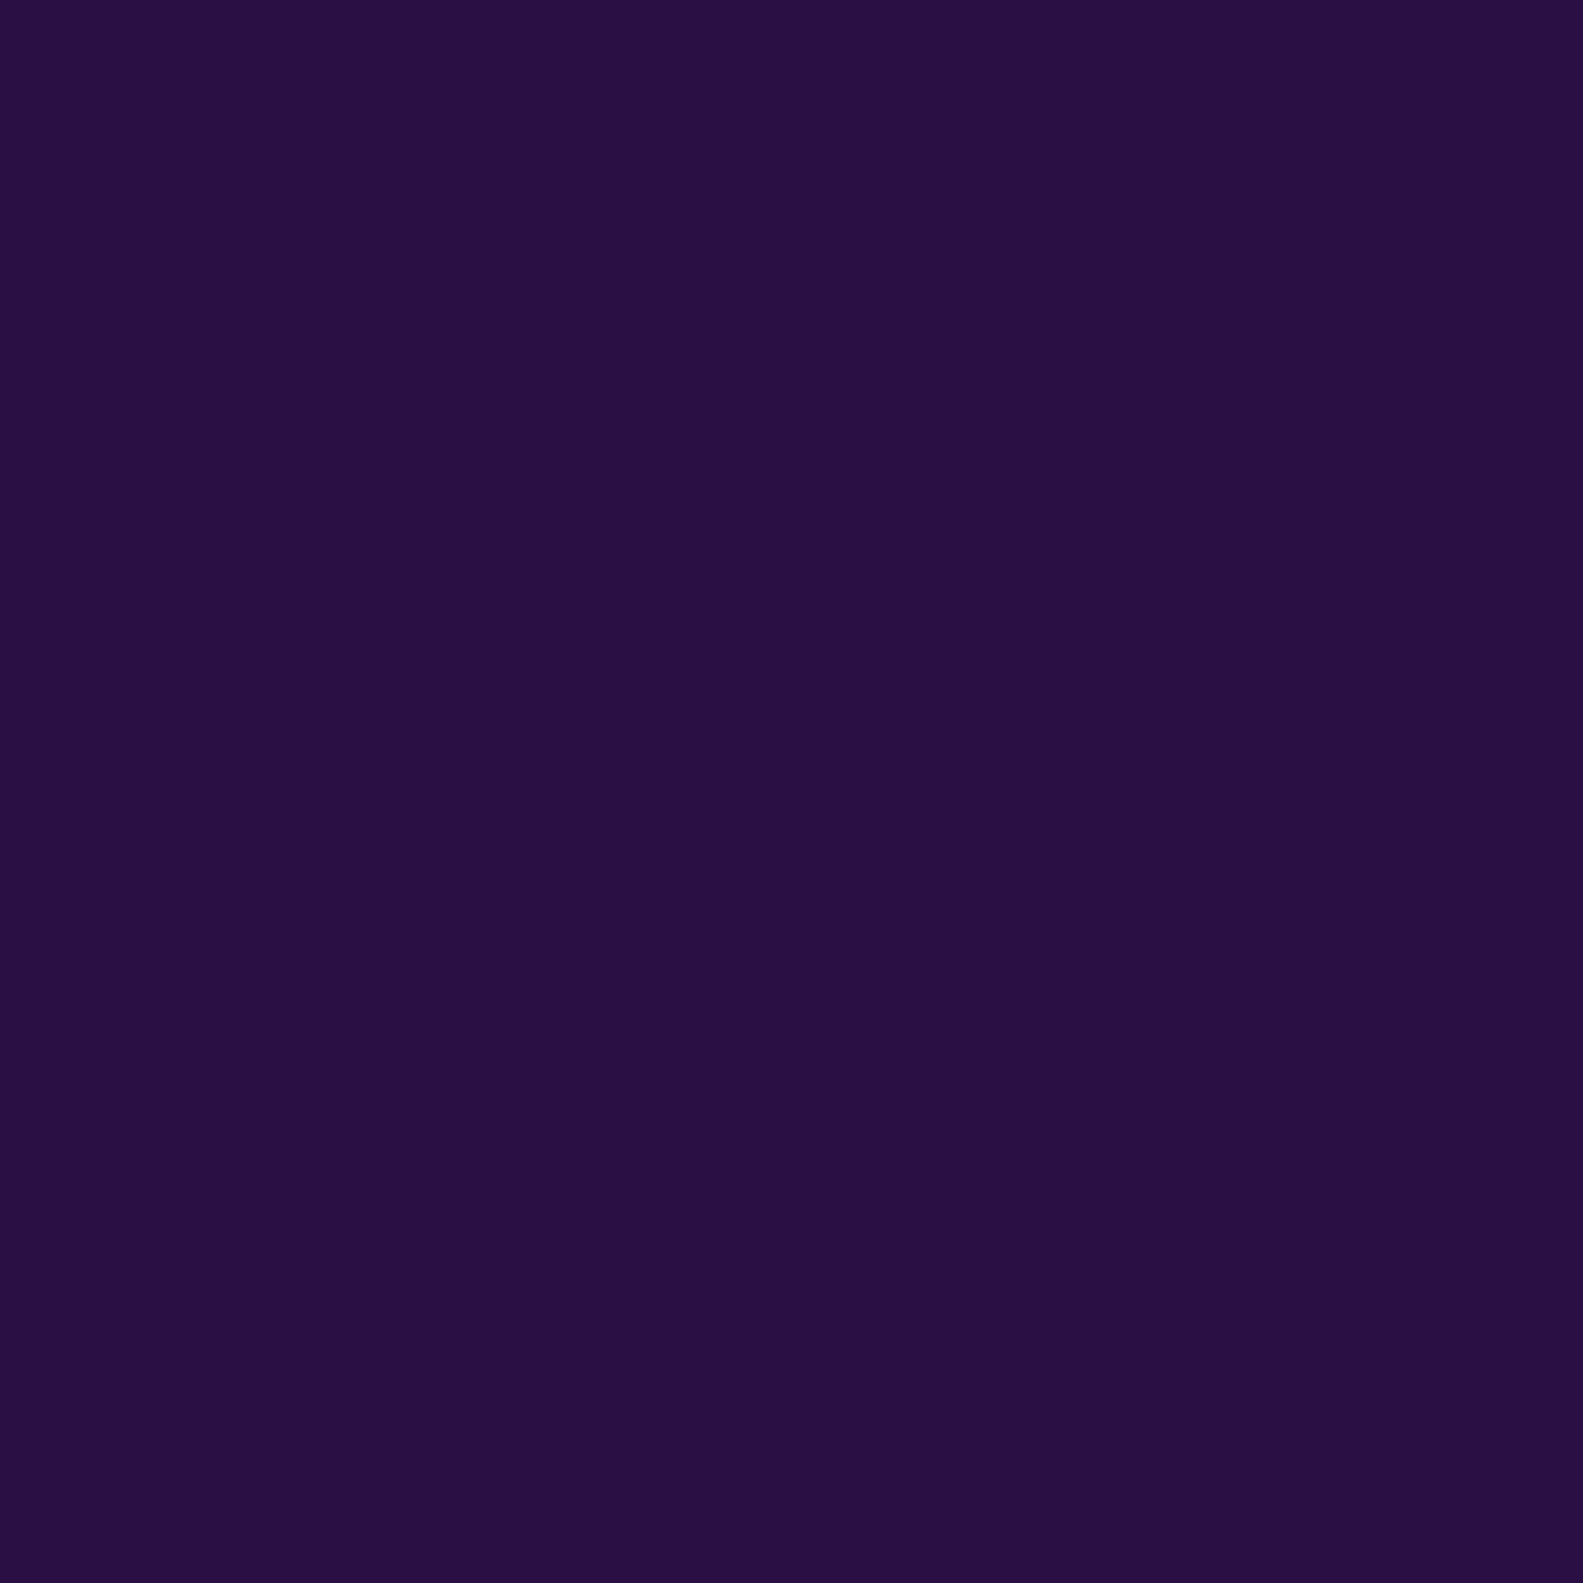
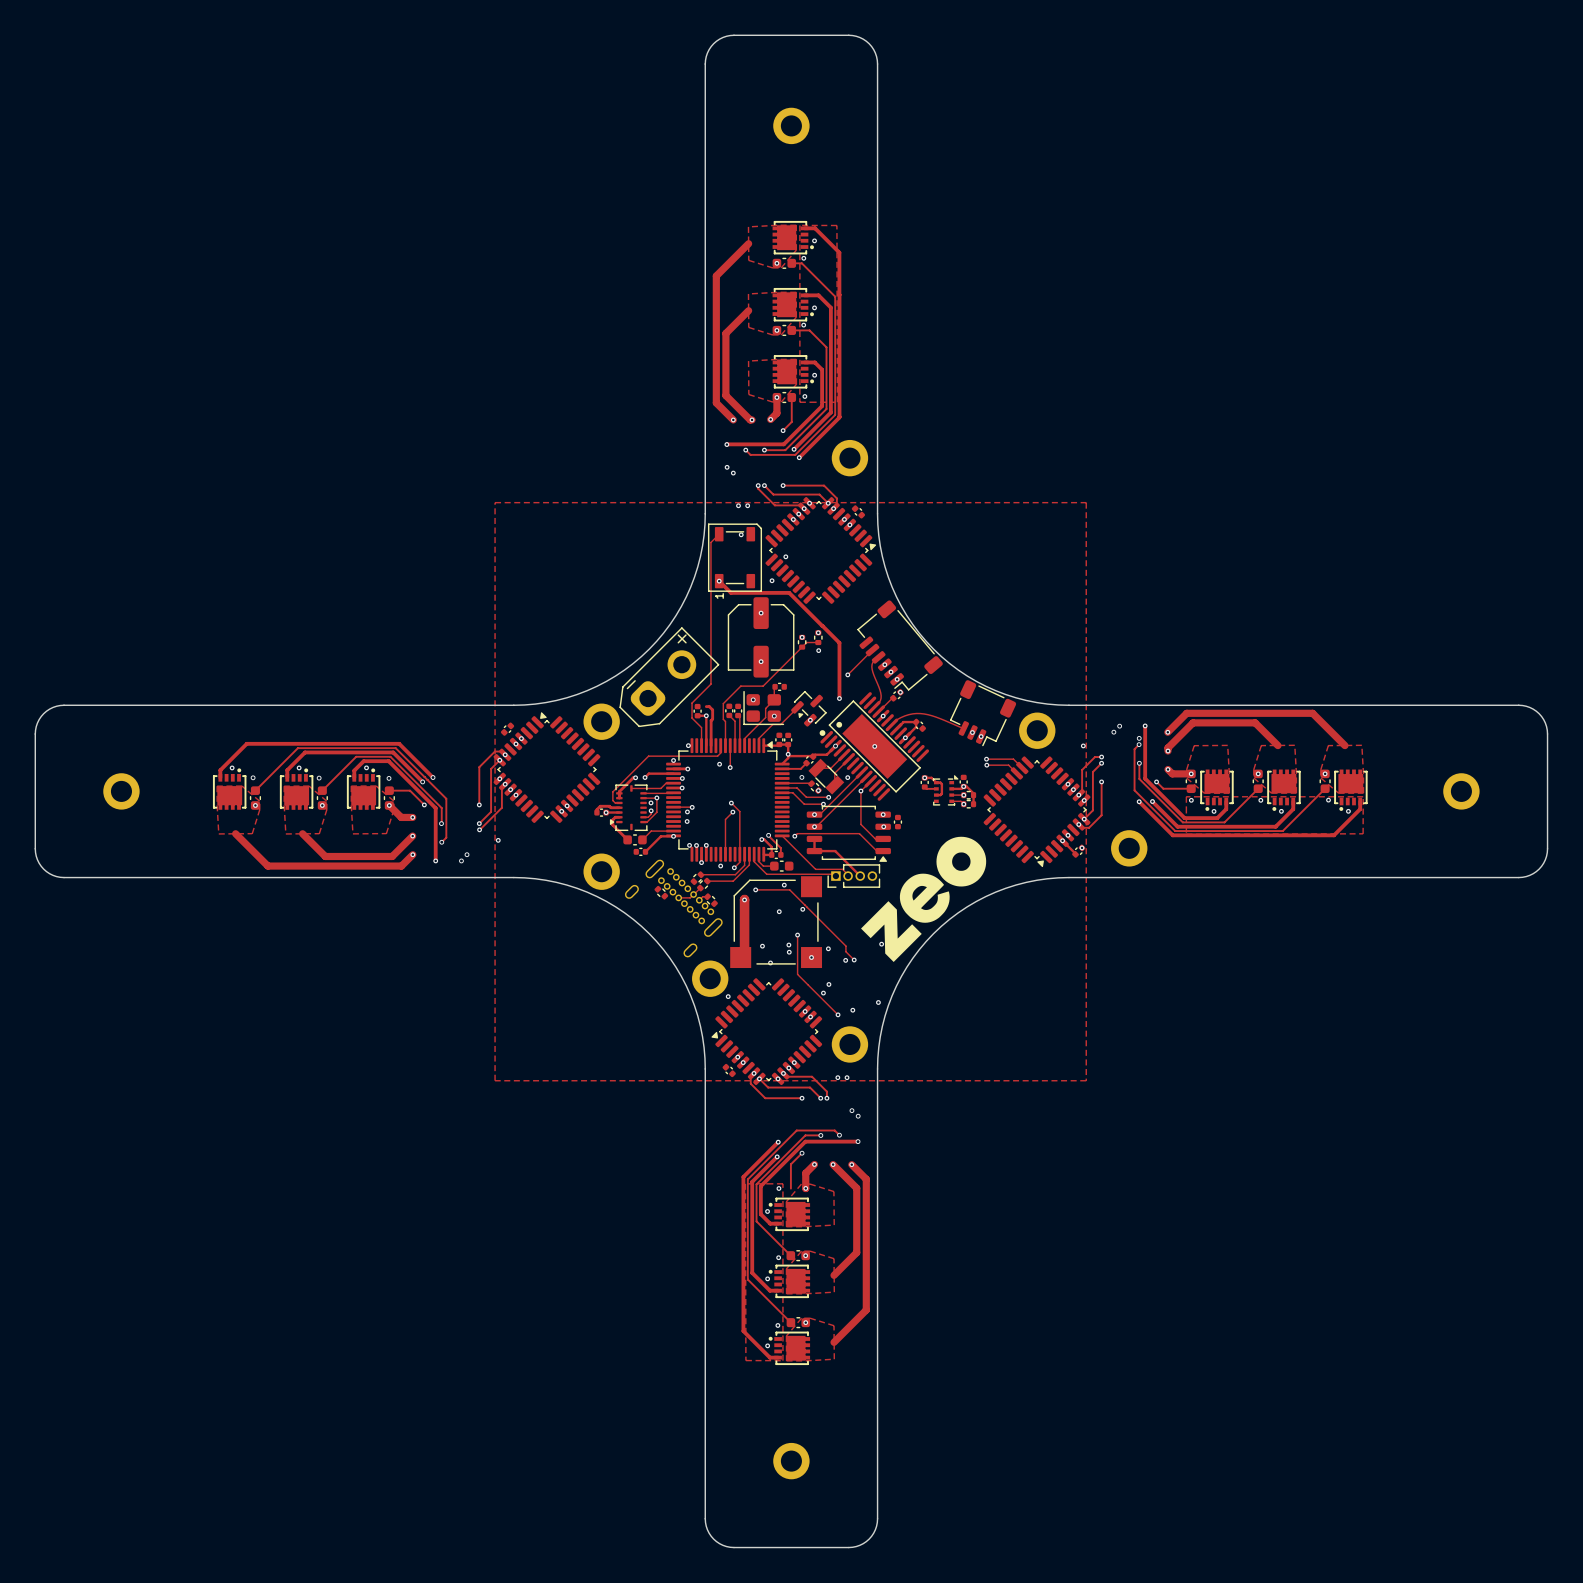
board edge: none -> (733, 35) (852, 35) (869, 43) (876, 56) (878, 535) (885, 566) (896, 596) (912, 624) (941, 656) (958, 669) (985, 686) (1015, 697) (1047, 704) (1518, 705) (1529, 707) (1539, 713) (1547, 730) (1547, 852) (1541, 866) (1529, 875) (1518, 877) (1047, 878) (1015, 885) (985, 896) (958, 912) (926, 941) (906, 967) (892, 995) (882, 1026) (878, 1047) (877, 1518) (871, 1536) (863, 1543) (852, 1547) (730, 1547) (716, 1541) (707, 1529) (705, 1518) (704, 1047) (697, 1015) (686, 985) (663, 949) (641, 926) (615, 906) (587, 892) (556, 882) (535, 878) (64, 877) (46, 871) (39, 863) (35, 852) (35, 730) (41, 716) (53, 707) (64, 705) (535, 704) (566, 697) (596, 686) (624, 669) (656, 641) (675, 615) (690, 587) (700, 556) (704, 535) (705, 64) (707, 53) (713, 43) (723, 37) (733, 35)
part: none -> (791, 125)
zone outline: none -> (777, 225) (796, 225) (796, 250) (781, 267) (772, 267) (748, 260) (748, 226) (777, 225)
zone outline: none -> (799, 225) (799, 402) (837, 402) (836, 225) (799, 225)
track: none -> (804, 228) (815, 228) (839, 252) (839, 294)
part: none -> (793, 237)
via: none -> (814, 240)
track: none -> (748, 243) (716, 276) (716, 402) (733, 419)
via: none -> (803, 258)
via: none -> (776, 263)
part: none -> (784, 263)
track: none -> (791, 263) (801, 263) (835, 296) (835, 414) (795, 454) (750, 454) (745, 450)
zone outline: none -> (777, 292) (796, 292) (796, 317) (781, 334) (772, 334) (748, 327) (748, 293) (777, 292)
track: none -> (839, 294) (839, 416)
track: none -> (804, 295) (818, 295) (830, 307) (830, 412) (794, 449)
part: none -> (793, 304)
via: none -> (814, 307)
track: none -> (748, 310) (725, 333) (725, 395) (752, 419)
via: none -> (803, 325)
via: none -> (776, 330)
part: none -> (784, 330)
track: none -> (791, 330) (809, 330) (826, 347) (826, 409) (785, 450) (764, 450)
zone outline: none -> (777, 359) (796, 359) (796, 384) (781, 402) (772, 402) (748, 394) (748, 361) (777, 359)
track: none -> (804, 362) (814, 362) (822, 369) (822, 406) (783, 444) (726, 444)
part: none -> (793, 371)
via: none -> (814, 375)
via: none -> (804, 396)
track: none -> (776, 397) (776, 413) (770, 419)
via: none -> (776, 397)
part: none -> (784, 397)
track: none -> (791, 397) (791, 421) (783, 430)
track: none -> (839, 416) (799, 457)
via: none -> (733, 419)
via: none -> (752, 419)
via: none -> (770, 419)
via: none -> (783, 430)
via: none -> (726, 444)
via: none -> (794, 449)
via: none -> (745, 450)
via: none -> (764, 450)
via: none -> (799, 457)
part: none -> (849, 458)
via: none -> (727, 467)
via: none -> (733, 473)
track: none -> (758, 485) (758, 488) (774, 505) (800, 505) (804, 508)
via: none -> (758, 485)
track: none -> (764, 485) (773, 494) (819, 494) (828, 503)
via: none -> (764, 485)
track: none -> (783, 485) (824, 485) (836, 498) (836, 505) (833, 508)
via: none -> (783, 485)
zone outline: none -> (495, 502) (1086, 502) (1086, 1080) (495, 1080) (495, 502)
via: none -> (809, 503)
via: none -> (828, 503)
via: none -> (738, 505)
via: none -> (747, 505)
via: none -> (804, 508)
via: none -> (833, 508)
part: none -> (858, 511)
via: none -> (798, 514)
via: none -> (793, 519)
via: none -> (844, 519)
via: none -> (849, 524)
track: none -> (719, 534) (710, 542) (710, 684) (692, 703) (692, 718) (701, 727) (701, 745)
via: none -> (741, 534)
part: none -> (820, 550)
via: none -> (785, 556)
part: none -> (735, 557)
via: none -> (772, 580)
track: none -> (719, 581) (730, 592) (789, 592) (839, 642) (839, 698)
via: none -> (719, 581)
via: none -> (761, 613)
via: none -> (818, 632)
part: none -> (761, 637)
via: none -> (802, 637)
part: none -> (818, 637)
part: none -> (802, 642)
track: none -> (818, 642) (806, 642) (763, 686) (740, 686) (723, 703) (725, 745)
part: none -> (900, 645)
via: none -> (818, 650)
track: none -> (872, 650) (847, 674)
track: none -> (874, 660) (871, 666) (880, 692) (879, 702)
via: none -> (761, 661)
via: none -> (884, 664)
via: none -> (890, 672)
via: none -> (847, 674)
part: none -> (669, 677)
via: none -> (897, 679)
track: none -> (775, 686) (774, 699) (765, 708) (765, 717) (744, 738) (744, 745)
part: none -> (779, 686)
via: none -> (900, 692)
part: none -> (896, 695)
via: none -> (839, 698)
track: none -> (893, 698) (878, 711)
via: none -> (753, 699)
track: none -> (706, 706) (712, 709) (711, 745)
track: none -> (797, 707) (780, 724) (772, 724) (758, 738) (758, 745)
part: none -> (763, 708)
part: none -> (808, 708)
part: none -> (729, 710)
part: none -> (738, 710)
part: none -> (697, 711)
part: none -> (983, 713)
track: none -> (697, 715) (706, 715) (706, 745)
via: none -> (706, 715)
track: none -> (729, 715) (735, 721) (735, 745)
track: none -> (738, 715) (739, 717) (739, 745)
via: none -> (774, 716)
via: none -> (883, 716)
track: none -> (896, 719) (908, 714) (924, 713) (963, 728)
via: none -> (810, 720)
part: none -> (601, 721)
part: none -> (919, 725)
track: none -> (1145, 725) (1145, 778) (1184, 818) (1217, 818) (1226, 809) (1226, 801)
via: none -> (1145, 725)
via: none -> (1119, 726)
part: none -> (507, 729)
track: none -> (896, 729) (903, 722) (916, 722) (916, 727) (905, 738)
part: none -> (1037, 730)
via: none -> (972, 732)
via: none -> (1113, 732)
track: none -> (1167, 732) (1186, 713) (1312, 713) (1344, 745)
via: none -> (1167, 732)
via: none -> (981, 736)
via: none -> (905, 737)
via: none -> (521, 738)
via: none -> (1139, 738)
part: none -> (779, 739)
part: none -> (788, 739)
via: none -> (516, 743)
track: none -> (779, 744) (763, 745)
track: none -> (779, 744) (788, 744) (788, 758) (782, 764)
track: none -> (1139, 744) (1134, 749) (1134, 790) (1175, 831) (1282, 831) (1325, 788)
via: none -> (1139, 744)
via: none -> (688, 745)
track: none -> (720, 745) (720, 753) (717, 756) (648, 756) (612, 791) (612, 800) (619, 802)
track: none -> (730, 745) (730, 767)
via: none -> (1083, 745)
zone outline: none -> (1227, 745) (1229, 793) (1204, 793) (1186, 778) (1186, 769) (1194, 745) (1227, 745)
track: none -> (1277, 745) (1255, 722) (1193, 722) (1167, 747) (1167, 751)
zone outline: none -> (1294, 745) (1296, 793) (1271, 793) (1253, 778) (1253, 769) (1261, 745) (1294, 745)
zone outline: none -> (1361, 745) (1363, 793) (1338, 793) (1320, 778) (1320, 769) (1328, 745) (1361, 745)
track: none -> (835, 746) (826, 754) (814, 754) (813, 756) (789, 756) (788, 754)
via: none -> (835, 746)
part: none -> (874, 746)
via: none -> (874, 746)
via: none -> (1167, 751)
track: none -> (505, 754) (501, 751) (494, 751) (479, 767) (479, 804)
via: none -> (505, 754)
via: none -> (788, 754)
track: none -> (844, 754) (831, 768) (817, 768)
track: none -> (1101, 757) (1095, 757) (1082, 769) (1082, 791) (1078, 795)
via: none -> (1101, 757)
part: none -> (809, 759)
track: none -> (848, 759) (834, 773) (834, 785)
track: none -> (986, 759) (1013, 759) (1022, 768)
via: none -> (986, 759)
track: none -> (499, 760) (491, 768) (491, 811) (479, 823)
via: none -> (499, 760)
via: none -> (673, 760)
track: none -> (806, 763) (800, 768) (782, 768)
track: none -> (1101, 763) (1092, 771) (1092, 810) (1084, 819)
via: none -> (1101, 763)
track: none -> (1139, 763) (1139, 778) (1182, 822) (1224, 822) (1258, 788)
via: none -> (1139, 763)
via: none -> (719, 764)
track: none -> (986, 765) (1008, 765) (1016, 773)
via: none -> (986, 765)
via: none -> (232, 767)
via: none -> (299, 767)
via: none -> (366, 767)
part: none -> (546, 767)
via: none -> (730, 767)
track: none -> (673, 768) (687, 769)
via: none -> (687, 769)
track: none -> (1167, 769) (1172, 773) (1191, 773)
via: none -> (1167, 769)
track: none -> (861, 772) (819, 814) (814, 814)
track: none -> (673, 773) (648, 773) (644, 777)
via: none -> (1191, 773)
via: none -> (1258, 773)
via: none -> (1325, 773)
part: none -> (826, 776)
track: none -> (866, 776) (814, 826)
via: none -> (253, 777)
track: none -> (287, 777) (287, 770) (305, 752) (393, 752) (422, 781)
track: none -> (354, 777) (354, 770) (363, 761) (388, 761) (435, 808) (435, 860)
track: none -> (432, 777) (399, 743) (246, 743) (220, 770) (220, 777)
via: none -> (433, 777)
track: none -> (635, 777) (619, 791) (619, 798)
via: none -> (635, 777)
via: none -> (645, 777)
via: none -> (801, 777)
via: none -> (847, 777)
track: none -> (924, 777) (931, 777) (936, 782) (941, 784) (941, 793) (936, 795)
via: none -> (924, 777)
via: none -> (319, 778)
via: none -> (389, 778)
via: none -> (499, 778)
via: none -> (682, 778)
via: none -> (422, 781)
track: none -> (870, 781) (860, 791) (860, 824) (875, 838) (883, 838)
part: none -> (963, 781)
track: none -> (1101, 781) (1101, 815) (1089, 827) (1082, 827) (1078, 824)
via: none -> (1101, 781)
track: none -> (1156, 781) (1163, 788) (1191, 788)
via: none -> (1156, 781)
part: none -> (1191, 781)
part: none -> (1258, 781)
part: none -> (1325, 781)
part: none -> (924, 782)
track: none -> (673, 783) (666, 783) (660, 788) (631, 788)
track: none -> (782, 783) (811, 783)
track: none -> (505, 784) (501, 787) (501, 807) (479, 829)
via: none -> (505, 784)
via: none -> (1068, 784)
zone outline: none -> (242, 786) (259, 801) (259, 809) (252, 833) (218, 833) (217, 786) (242, 786)
zone outline: none -> (309, 786) (326, 801) (326, 809) (319, 833) (285, 833) (284, 786) (309, 786)
zone outline: none -> (376, 786) (393, 801) (393, 809) (386, 833) (352, 833) (351, 786) (376, 786)
via: none -> (963, 786)
part: none -> (814, 787)
track: none -> (924, 787) (926, 788) (936, 788)
via: none -> (682, 788)
track: none -> (782, 788) (797, 788) (806, 797) (828, 797)
track: none -> (951, 788) (966, 786) (973, 793) (973, 804)
part: none -> (229, 789)
part: none -> (296, 789)
part: none -> (363, 789)
via: none -> (510, 789)
via: none -> (1073, 789)
track: none -> (255, 790) (297, 748) (395, 748) (446, 798) (446, 837) (441, 842)
track: none -> (322, 790) (356, 756) (390, 756) (441, 808) (441, 823)
track: none -> (389, 790) (410, 790) (424, 804)
via: none -> (818, 790)
part: none -> (945, 790)
part: none -> (1216, 790)
part: none -> (1283, 790)
part: none -> (1350, 790)
part: none -> (121, 791)
via: none -> (860, 791)
part: none -> (1461, 791)
track: none -> (673, 792) (643, 793)
track: none -> (782, 792) (792, 792) (804, 804) (823, 804)
via: none -> (516, 795)
track: none -> (951, 795) (963, 795)
via: none -> (963, 795)
part: none -> (968, 795)
via: none -> (1078, 795)
zone outline: none -> (1186, 796) (1363, 796) (1363, 833) (1186, 834) (1186, 796)
via: none -> (656, 797)
via: none -> (828, 797)
part: none -> (255, 798)
part: none -> (322, 798)
part: none -> (389, 798)
track: none -> (643, 798) (656, 797) (656, 812) (647, 822) (643, 822)
part: none -> (727, 799)
via: none -> (1084, 800)
via: none -> (1191, 800)
via: none -> (1260, 800)
via: none -> (1328, 800)
track: none -> (951, 801) (960, 801) (963, 804)
via: none -> (1139, 801)
via: none -> (1152, 801)
track: none -> (1293, 801) (1293, 809) (1275, 826) (1177, 826) (1152, 801)
track: none -> (1360, 801) (1360, 809) (1334, 835) (1172, 835) (1139, 801)
via: none -> (651, 802)
track: none -> (731, 803) (739, 811) (739, 862) (734, 867)
via: none -> (731, 803)
via: none -> (424, 804)
via: none -> (479, 804)
via: none -> (823, 804)
via: none -> (963, 804)
part: none -> (968, 804)
via: none -> (255, 805)
via: none -> (322, 805)
track: none -> (389, 805) (401, 817) (412, 817)
via: none -> (389, 805)
via: none -> (567, 805)
track: none -> (619, 807) (600, 806) (596, 812)
part: none -> (628, 807)
track: none -> (673, 807) (692, 807)
via: none -> (692, 807)
track: none -> (651, 810) (648, 817) (643, 817)
via: none -> (651, 810)
via: none -> (561, 811)
via: none -> (687, 811)
part: none -> (1037, 811)
via: none -> (1214, 811)
via: none -> (1281, 811)
via: none -> (1348, 811)
part: none -> (601, 812)
track: none -> (606, 812) (619, 812)
via: none -> (606, 812)
track: none -> (732, 812) (725, 819) (725, 854)
via: none -> (732, 812)
via: none -> (814, 814)
via: none -> (883, 814)
via: none -> (412, 817)
track: none -> (619, 817) (612, 819) (612, 825) (627, 839)
via: none -> (1084, 819)
via: none -> (687, 821)
part: none -> (897, 822)
via: none -> (441, 823)
via: none -> (479, 823)
via: none -> (1078, 824)
via: none -> (814, 826)
via: none -> (883, 826)
via: none -> (479, 829)
track: none -> (673, 831) (651, 831) (642, 839)
track: none -> (235, 833) (267, 866) (401, 866) (412, 854)
track: none -> (302, 833) (325, 856) (392, 856) (412, 836)
part: none -> (848, 833)
track: none -> (673, 835) (660, 836) (645, 851)
track: none -> (768, 835) (780, 848) (780, 854)
via: none -> (768, 835)
track: none -> (782, 835) (815, 869) (842, 869) (848, 876)
via: none -> (1068, 835)
via: none -> (412, 836)
via: none -> (673, 836)
track: none -> (794, 836) (797, 833) (859, 833) (876, 851) (883, 851)
via: none -> (794, 836)
drawing: none -> [861, 836, 987, 962]
track: none -> (814, 838) (814, 851) (835, 851) (860, 876)
part: none -> (635, 839)
track: none -> (761, 839) (771, 846) (771, 854) (763, 854)
via: none -> (761, 839)
via: none -> (498, 840)
track: none -> (1062, 840) (1075, 854)
via: none -> (1062, 840)
via: none -> (441, 842)
via: none -> (689, 845)
via: none -> (696, 845)
via: none -> (706, 845)
via: none -> (1082, 847)
part: none -> (1129, 848)
part: none -> (640, 851)
part: none -> (1078, 851)
via: none -> (412, 854)
via: none -> (467, 854)
track: none -> (744, 854) (744, 865) (735, 874) (700, 874)
track: none -> (749, 854) (749, 864) (733, 881) (707, 881)
track: none -> (754, 854) (754, 861) (766, 874) (834, 874) (835, 876)
track: none -> (758, 854) (758, 861) (763, 866) (774, 866)
part: none -> (776, 854)
via: none -> (435, 860)
via: none -> (461, 860)
via: none -> (701, 862)
via: none -> (720, 866)
part: none -> (781, 866)
via: none -> (734, 867)
part: none -> (601, 871)
part: none -> (853, 876)
part: none -> (697, 878)
part: none -> (703, 884)
via: none -> (784, 885)
track: none -> (700, 888) (690, 897) (678, 897)
track: none -> (755, 889) (789, 889) (845, 946) (845, 951) (854, 960)
via: none -> (755, 889)
part: none -> (661, 892)
track: none -> (707, 896) (702, 896) (699, 900)
track: none -> (744, 899) (744, 953) (740, 957)
via: none -> (744, 899)
part: none -> (711, 900)
part: none -> (673, 908)
via: none -> (802, 909)
via: none -> (779, 911)
part: none -> (776, 922)
track: none -> (797, 935) (797, 974) (838, 1014)
via: none -> (797, 935)
via: none -> (881, 944)
via: none -> (788, 945)
via: none -> (762, 946)
via: none -> (828, 948)
via: none -> (789, 952)
via: none -> (811, 957)
via: none -> (845, 960)
via: none -> (854, 960)
via: none -> (770, 962)
part: none -> (710, 978)
via: none -> (828, 984)
via: none -> (823, 993)
via: none -> (728, 996)
via: none -> (878, 1002)
via: none -> (852, 1010)
via: none -> (805, 1011)
via: none -> (838, 1014)
via: none -> (810, 1016)
part: none -> (766, 1031)
part: none -> (849, 1044)
via: none -> (737, 1057)
via: none -> (743, 1062)
via: none -> (794, 1062)
via: none -> (788, 1068)
part: none -> (729, 1070)
track: none -> (754, 1073) (750, 1076) (750, 1083) (765, 1098) (802, 1098)
via: none -> (754, 1073)
track: none -> (783, 1073) (786, 1076) (812, 1076) (826, 1091) (826, 1098)
via: none -> (783, 1073)
via: none -> (837, 1077)
via: none -> (847, 1077)
track: none -> (759, 1078) (768, 1087) (810, 1087) (820, 1098)
via: none -> (759, 1078)
via: none -> (778, 1078)
via: none -> (802, 1098)
via: none -> (820, 1098)
via: none -> (826, 1098)
via: none -> (851, 1110)
via: none -> (858, 1116)
track: none -> (820, 1135) (805, 1135) (756, 1184) (756, 1221) (790, 1255)
via: none -> (820, 1135)
track: none -> (839, 1135) (834, 1130) (796, 1130) (747, 1179) (747, 1279) (790, 1322)
via: none -> (839, 1135)
track: none -> (858, 1141) (805, 1141) (760, 1186) (760, 1214) (770, 1223) (778, 1223)
via: none -> (858, 1141)
track: none -> (778, 1142) (743, 1176) (743, 1331) (769, 1357) (778, 1357)
via: none -> (778, 1142)
track: none -> (802, 1153) (790, 1164) (790, 1188)
via: none -> (802, 1153)
track: none -> (777, 1156) (752, 1181) (752, 1272) (769, 1290) (778, 1290)
via: none -> (777, 1156)
track: none -> (814, 1164) (805, 1173) (805, 1188)
via: none -> (814, 1164)
track: none -> (833, 1164) (856, 1188) (856, 1252) (834, 1275)
via: none -> (833, 1164)
track: none -> (851, 1164) (866, 1179) (866, 1310) (834, 1342)
via: none -> (851, 1164)
zone outline: none -> (745, 1183) (782, 1183) (782, 1360) (745, 1360) (745, 1183)
zone outline: none -> (801, 1184) (810, 1184) (833, 1191) (834, 1225) (786, 1226) (786, 1201) (801, 1184)
via: none -> (778, 1188)
via: none -> (805, 1188)
via: none -> (767, 1211)
part: none -> (789, 1214)
zone outline: none -> (801, 1251) (810, 1251) (834, 1258) (834, 1292) (786, 1293) (786, 1268) (801, 1251)
part: none -> (798, 1255)
via: none -> (805, 1255)
via: none -> (778, 1257)
via: none -> (767, 1278)
part: none -> (789, 1281)
zone outline: none -> (801, 1318) (810, 1318) (834, 1325) (834, 1359) (786, 1360) (786, 1335) (801, 1318)
part: none -> (798, 1322)
via: none -> (805, 1322)
via: none -> (777, 1325)
via: none -> (767, 1345)
part: none -> (789, 1348)
part: none -> (791, 1461)

